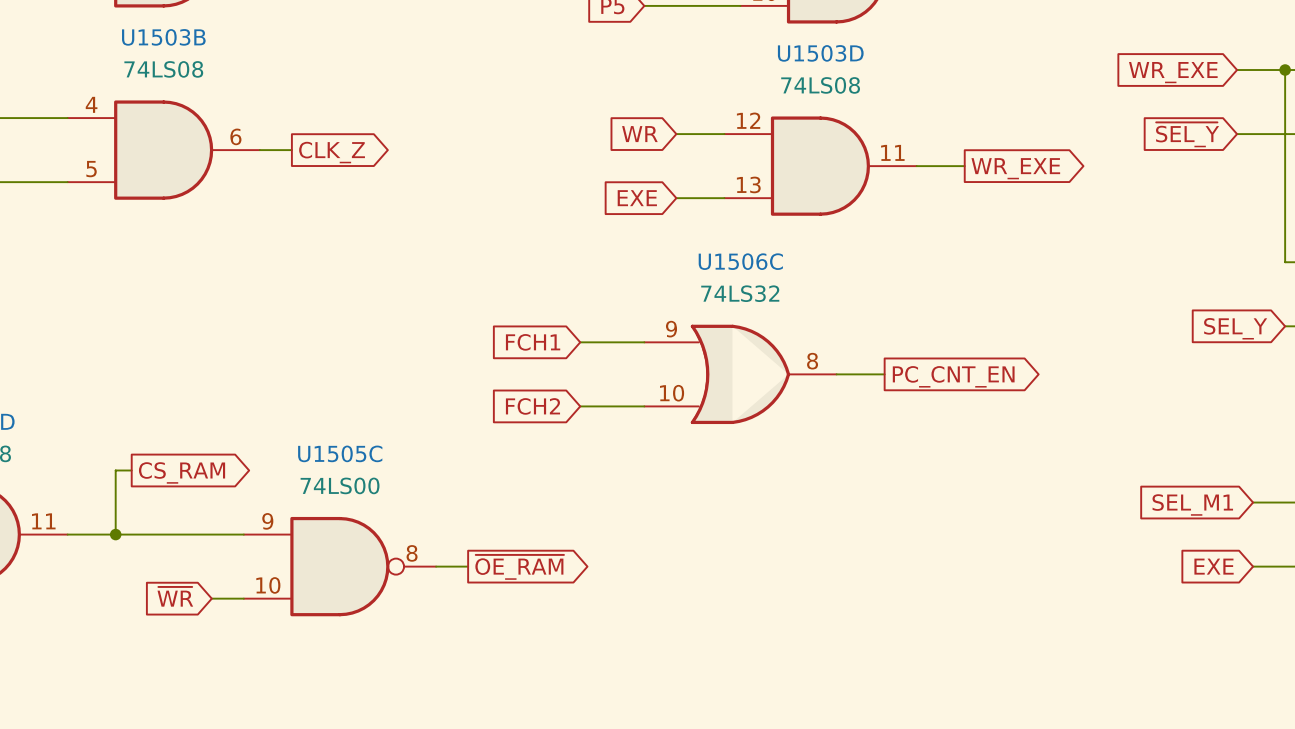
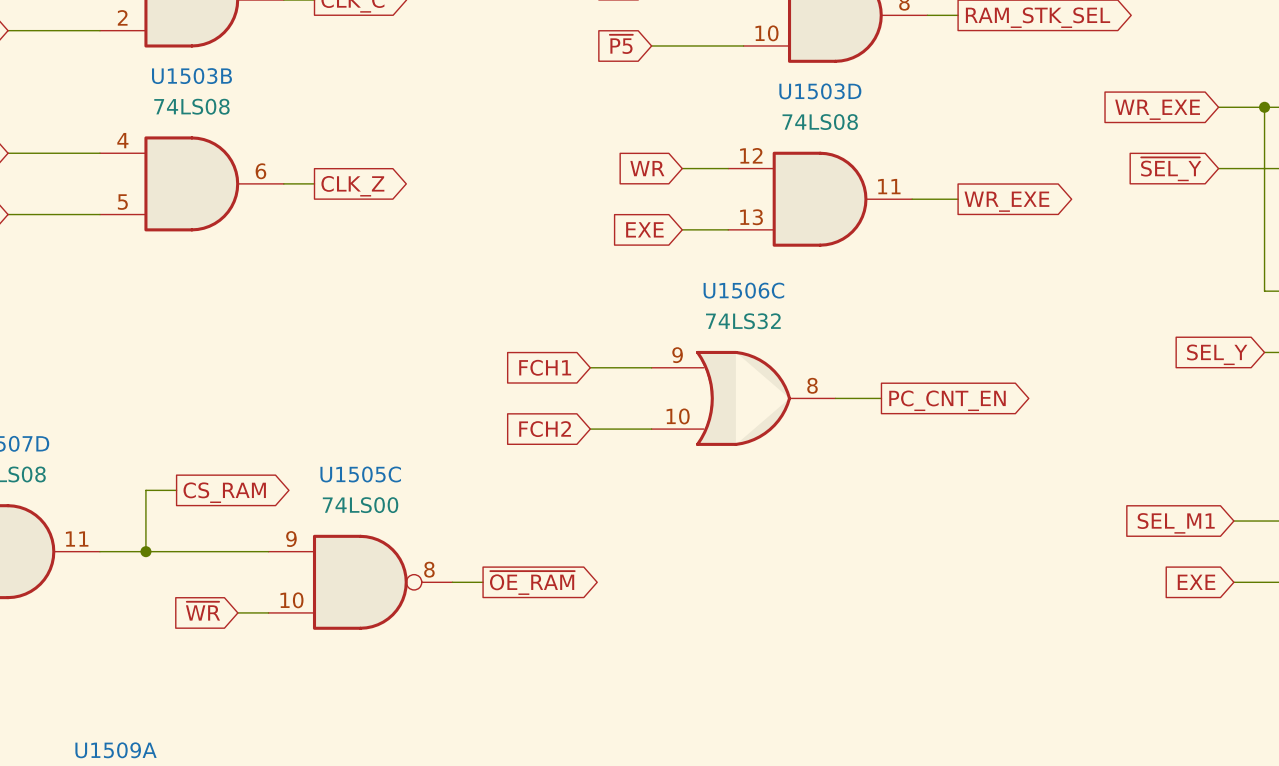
wire: none -> (161, 490) (176, 490)
global label position: CS_RAM (182, 472) -> CS_RAM (224, 492)

